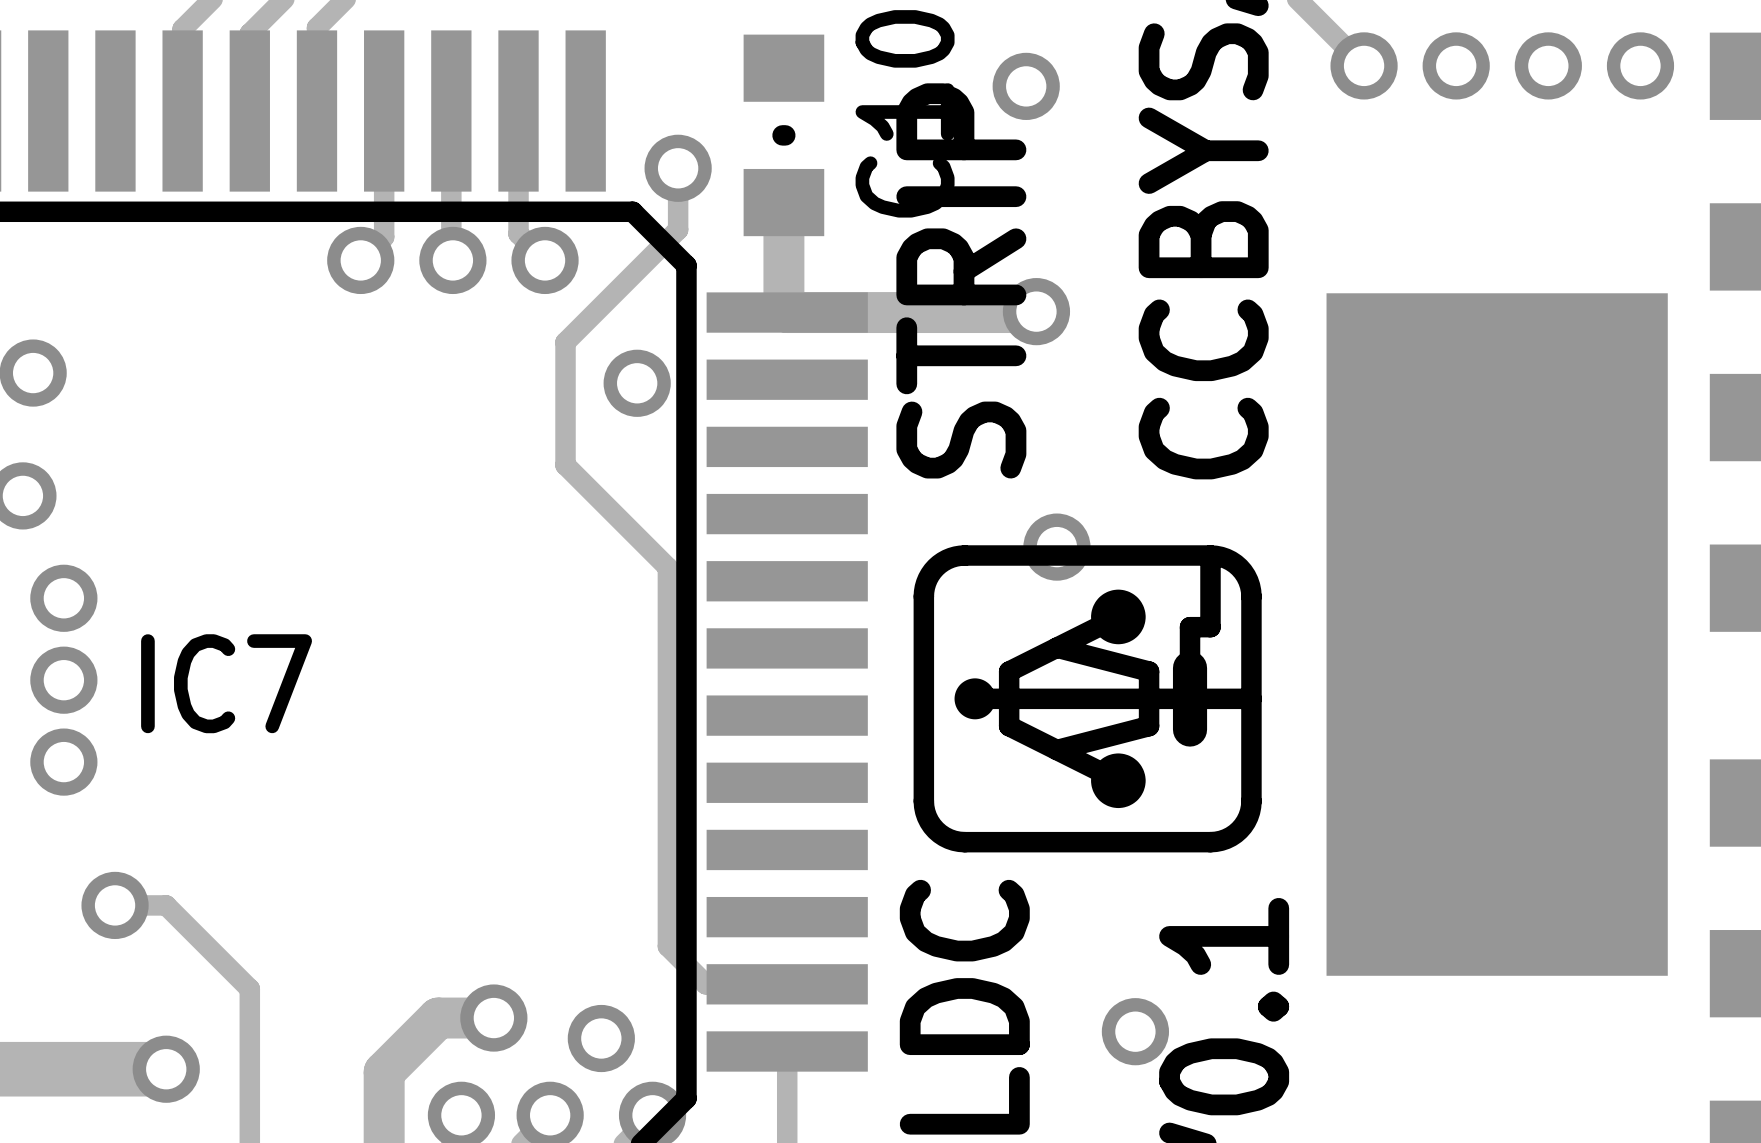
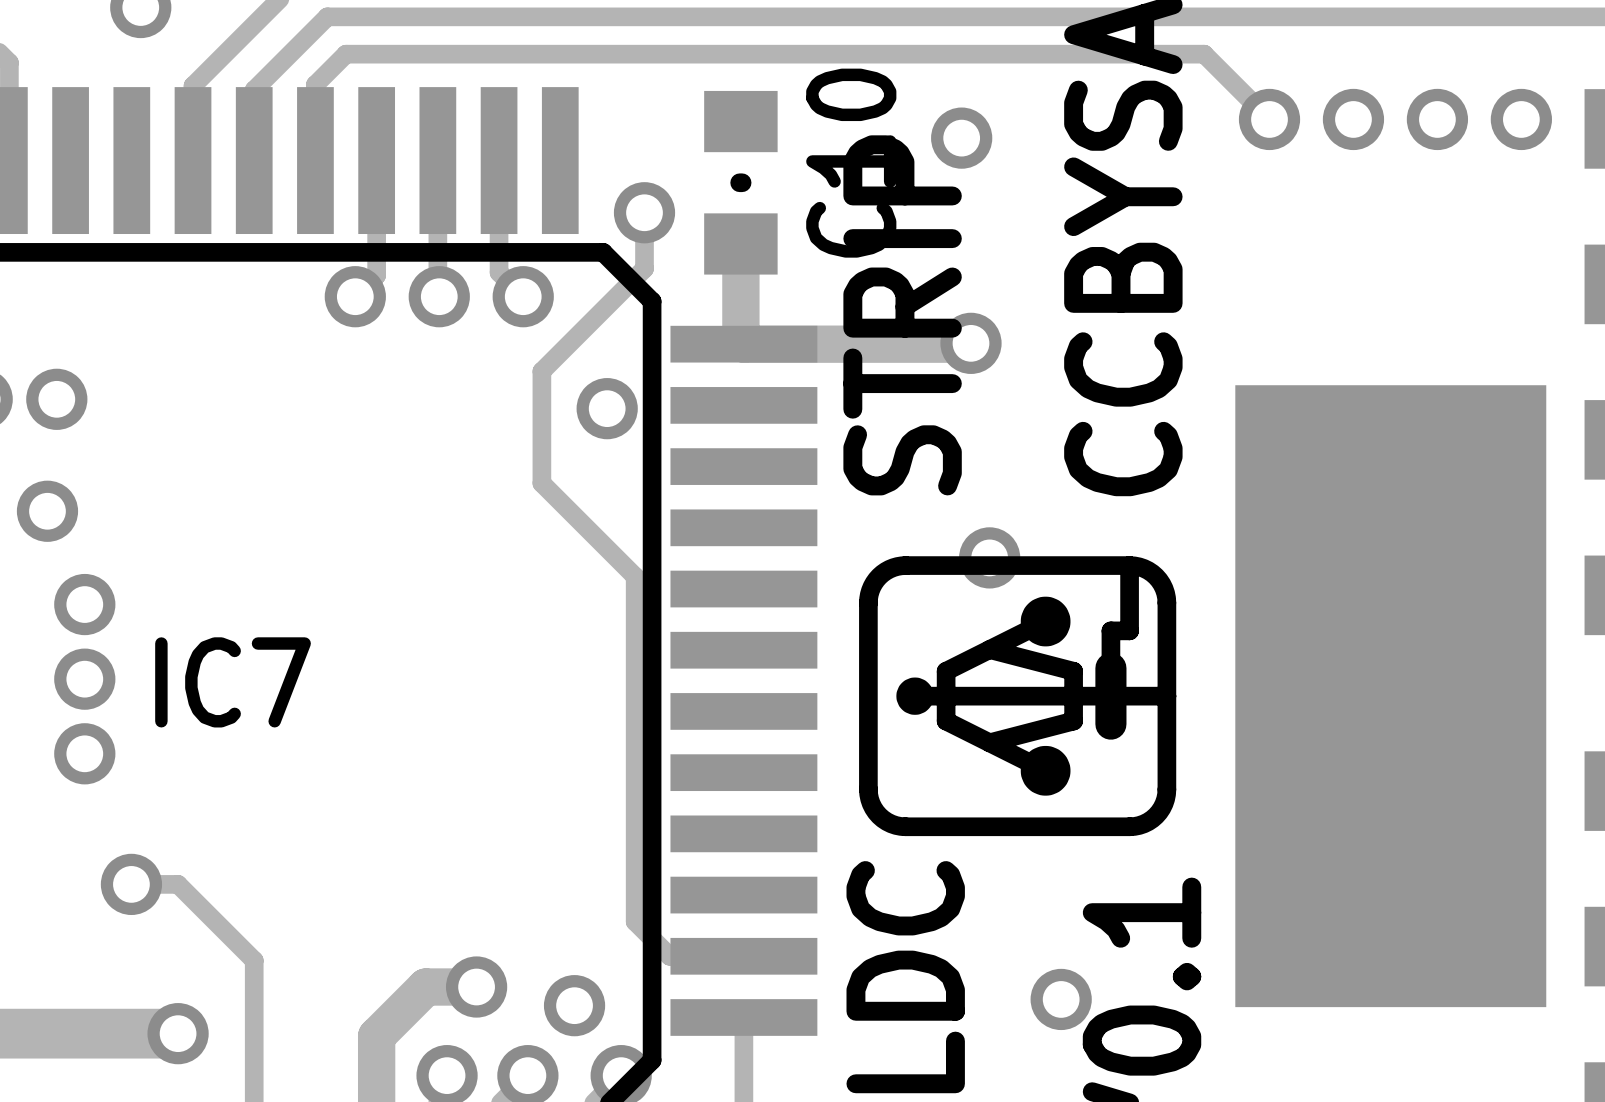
part position: (1497, 634) -> (1390, 696)

